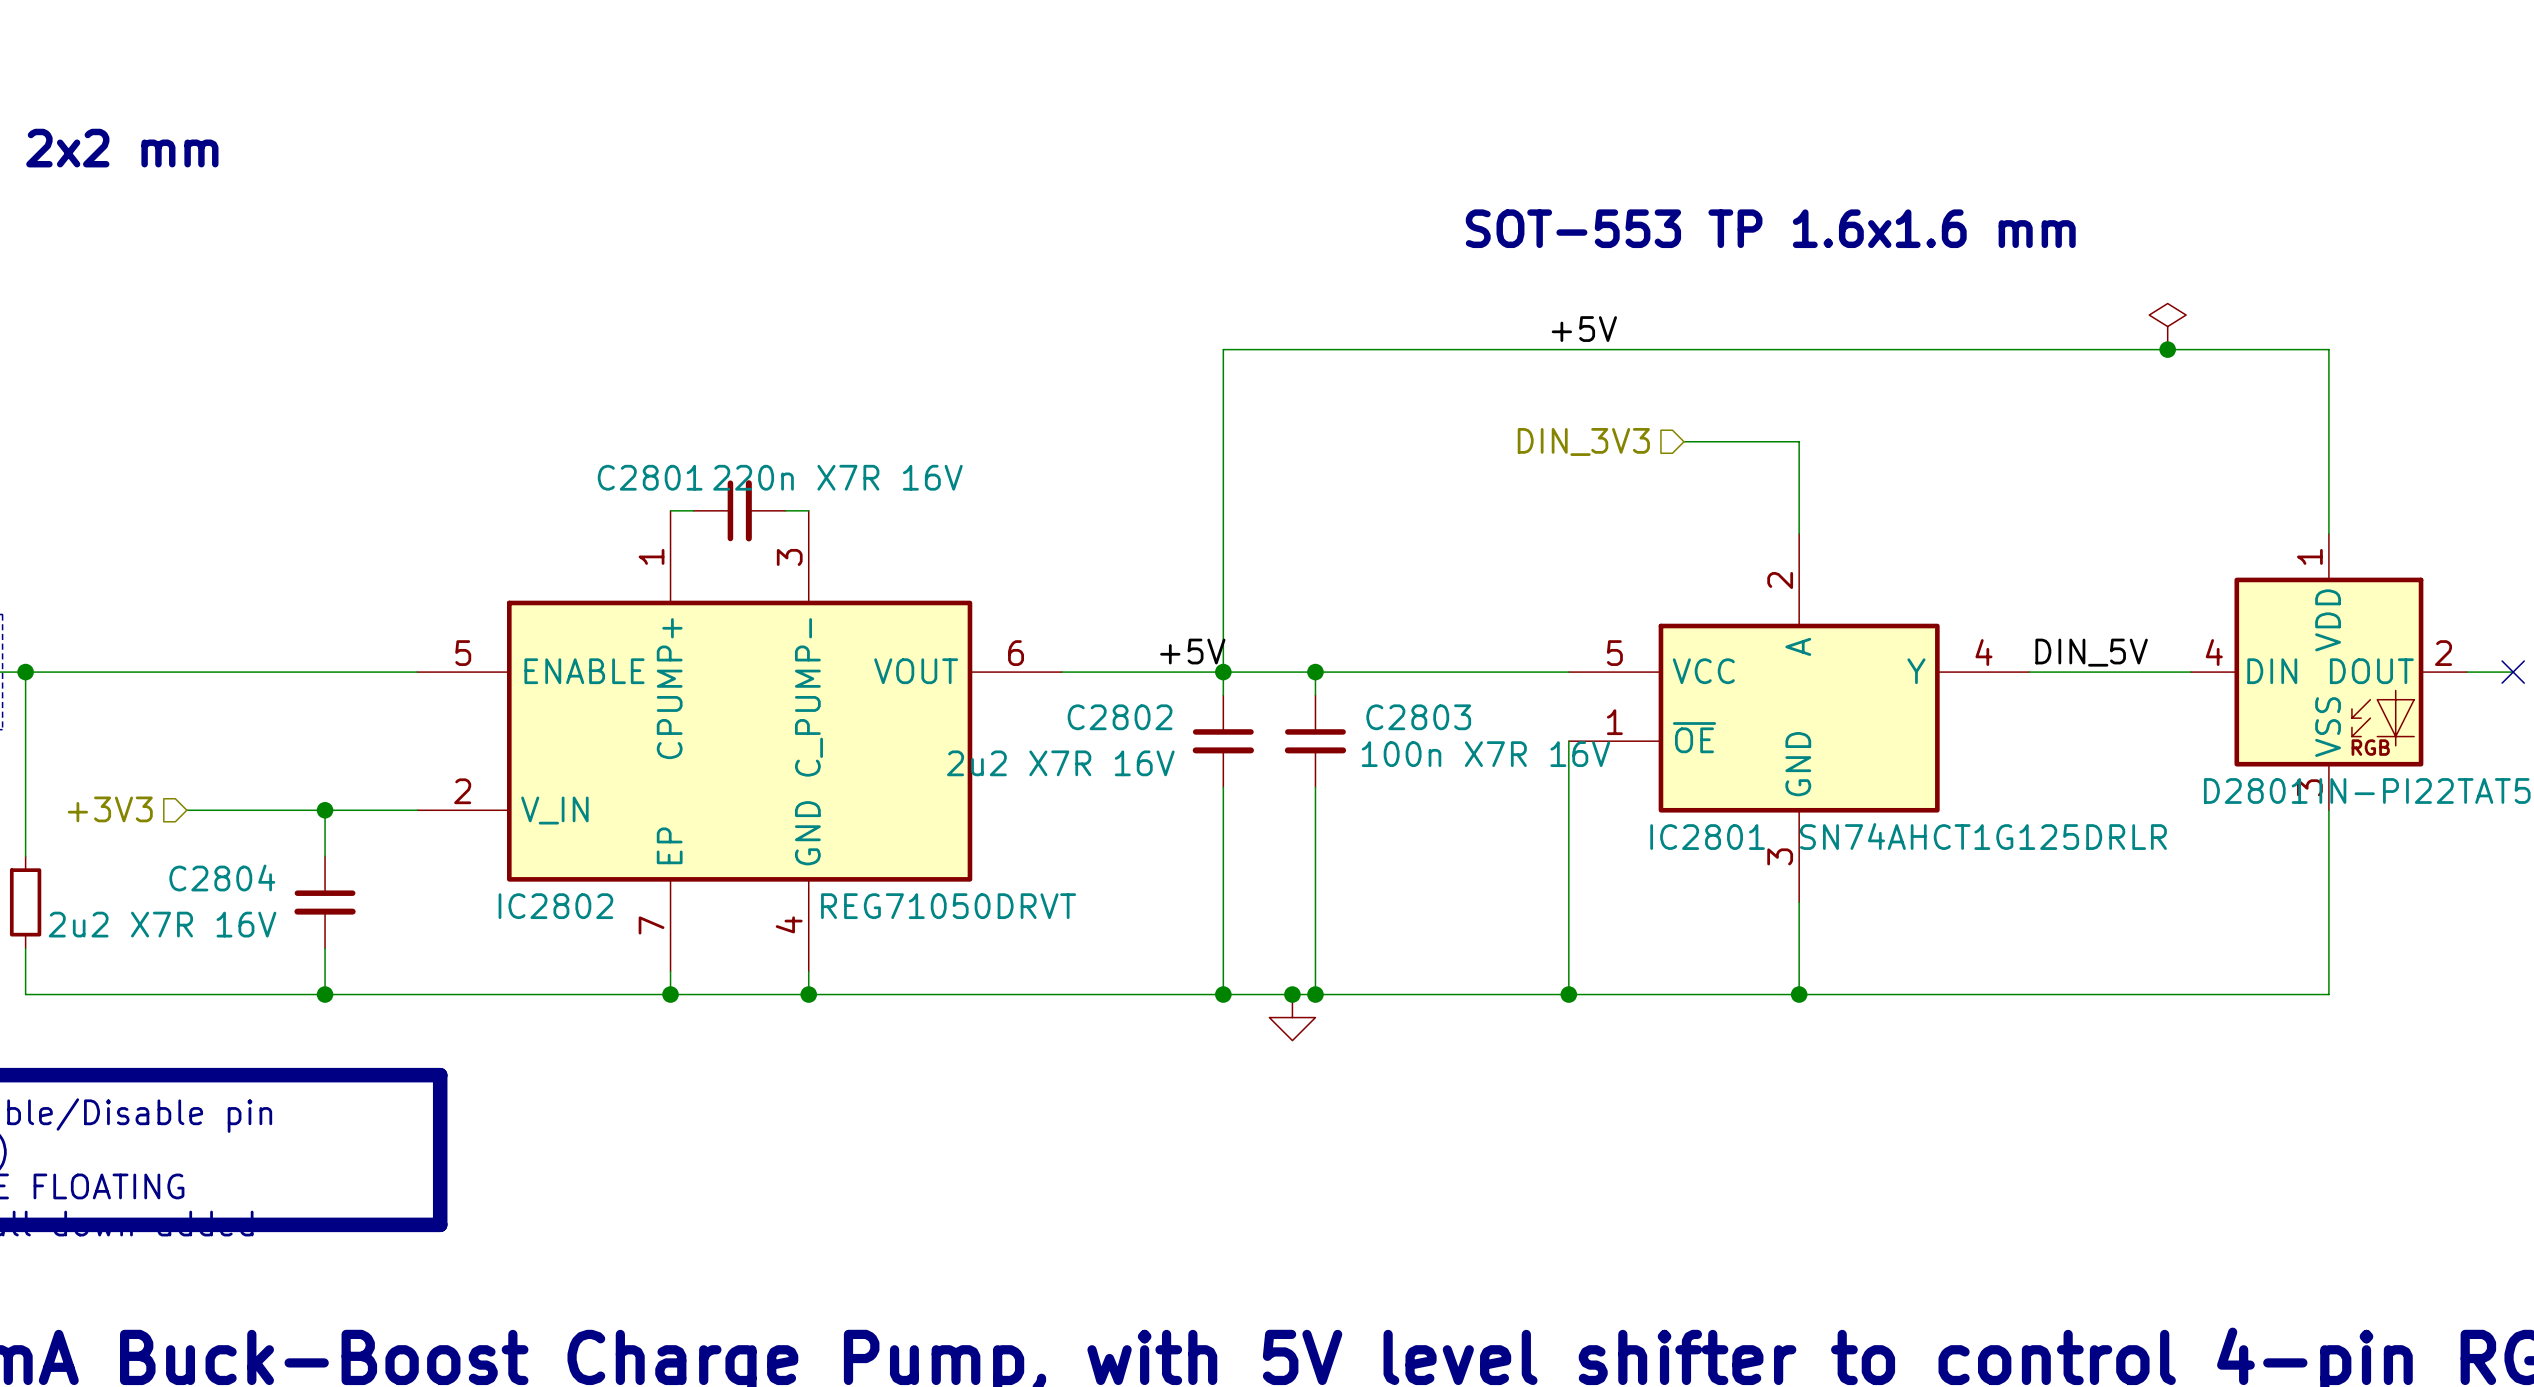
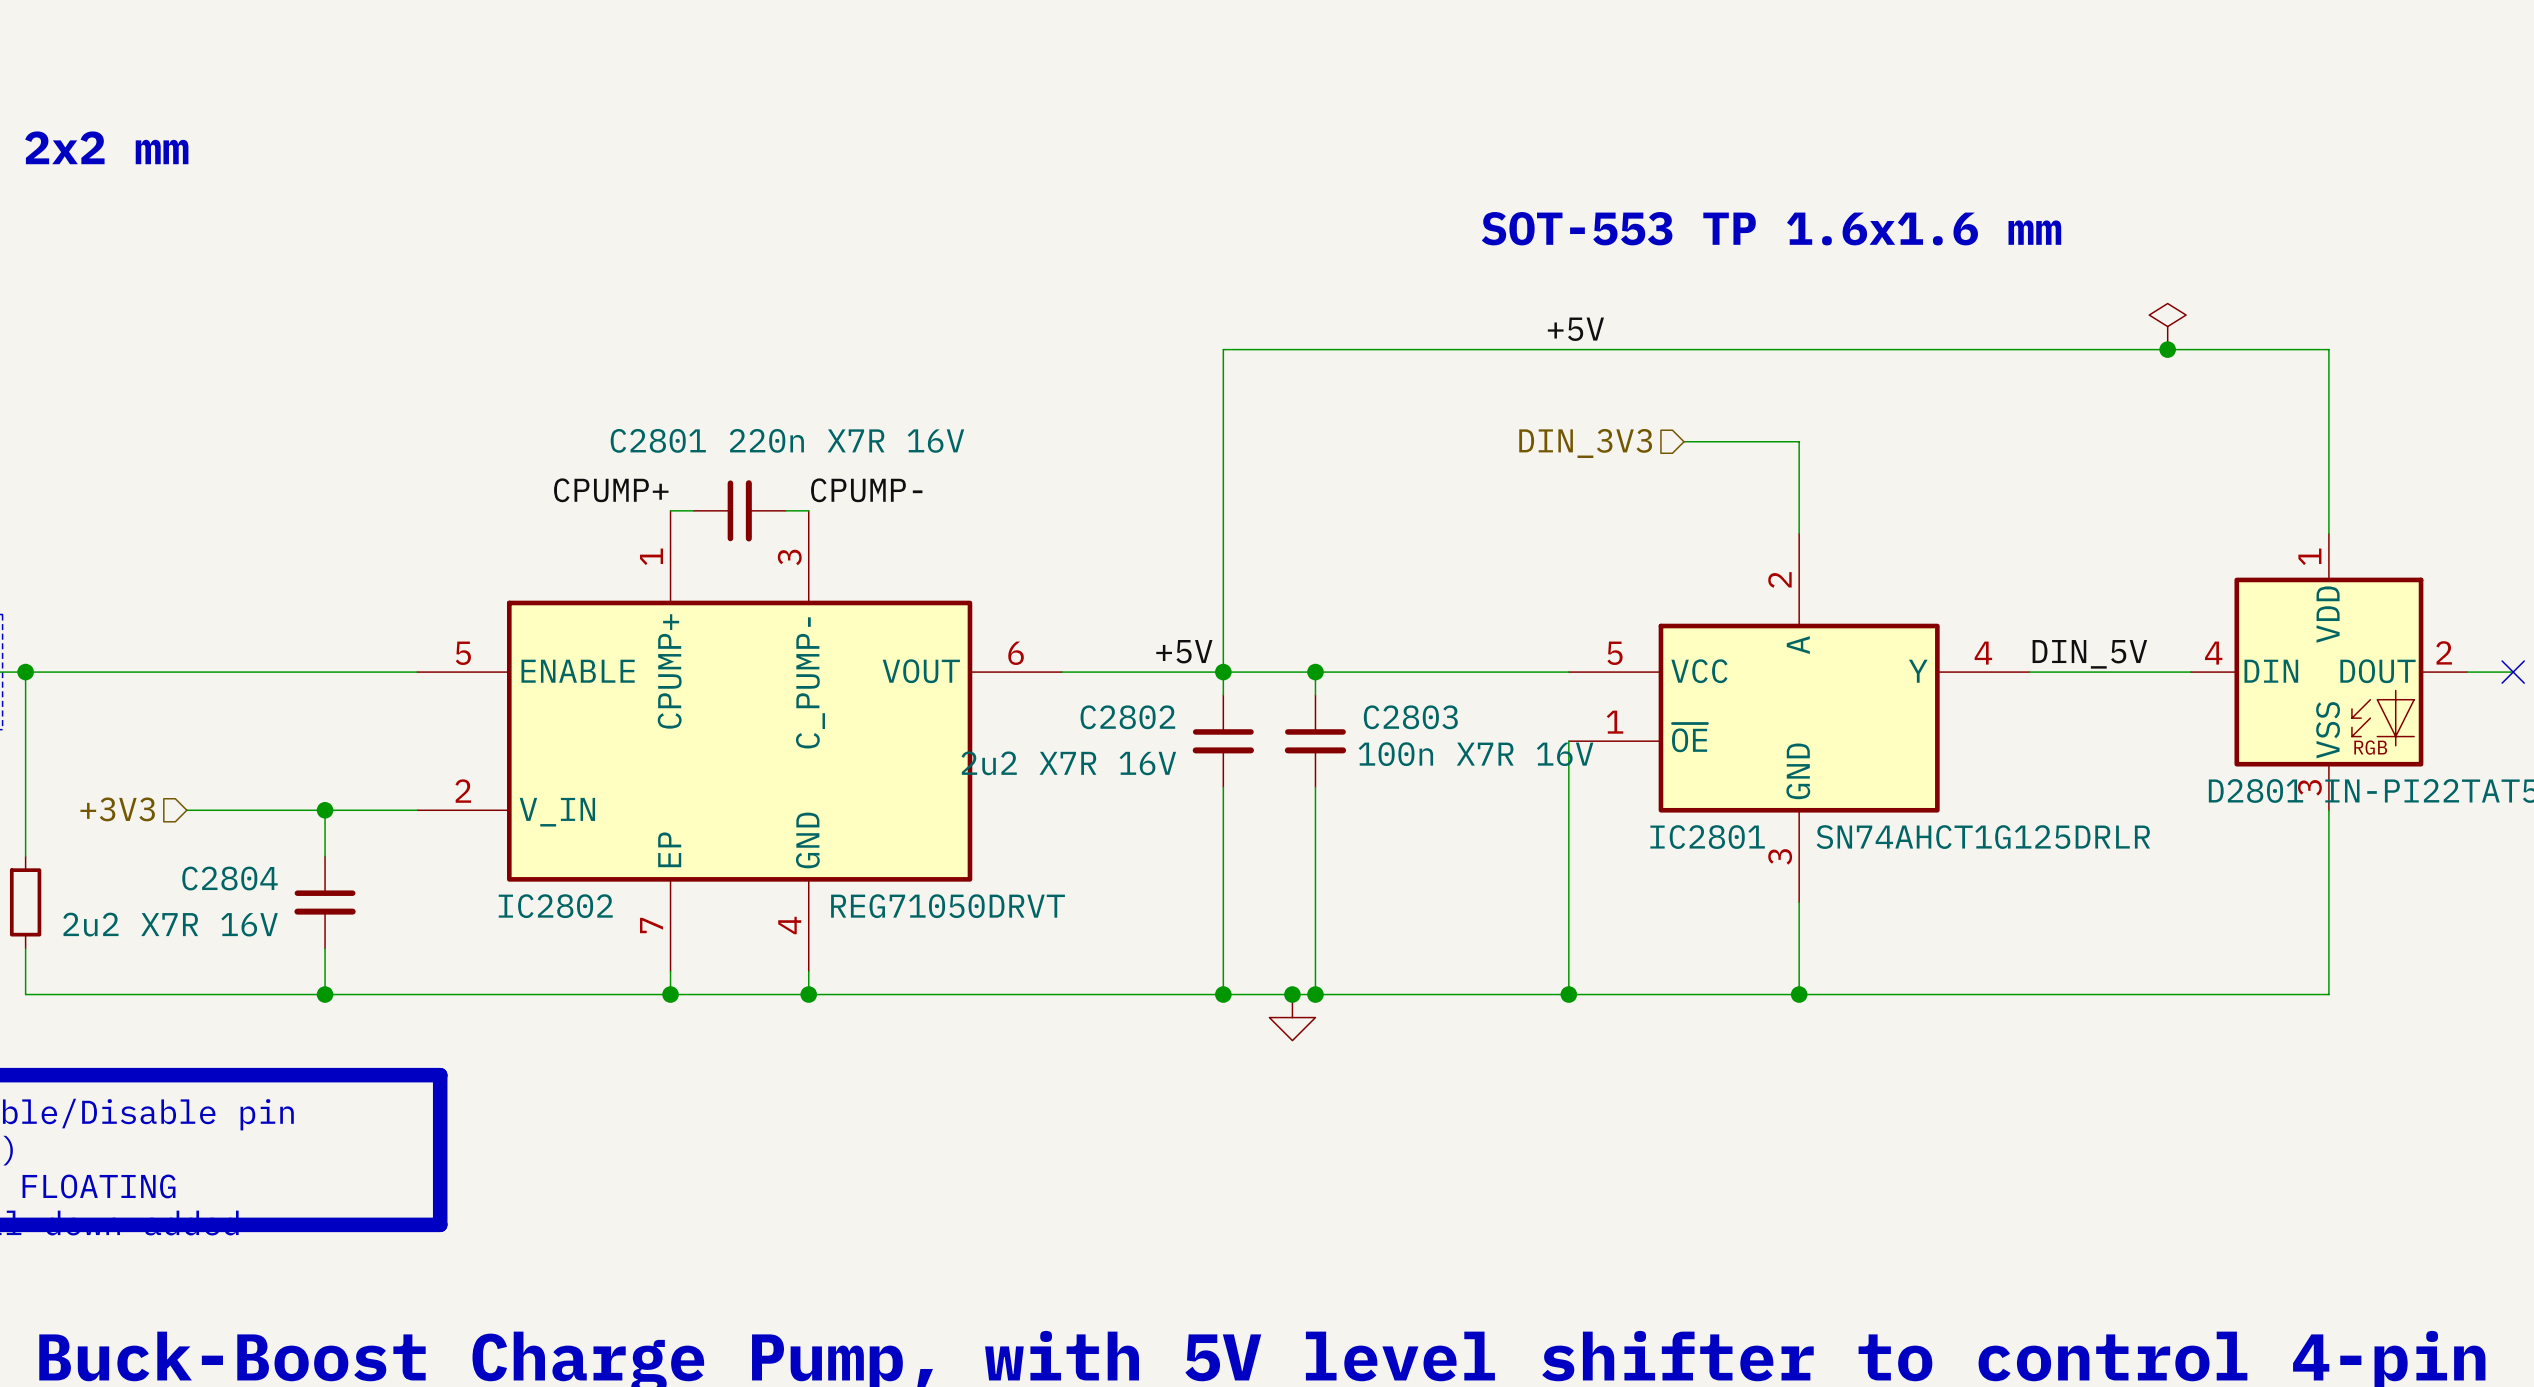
C2801 name position: C2801 (650, 477) -> C2801 (658, 440)
C2801 value position: 220n X7R 16V (837, 477) -> 220n X7R 16V (847, 440)
label: none -> CPUMP+ (611, 490)
label: none -> CPUMP- (866, 490)

